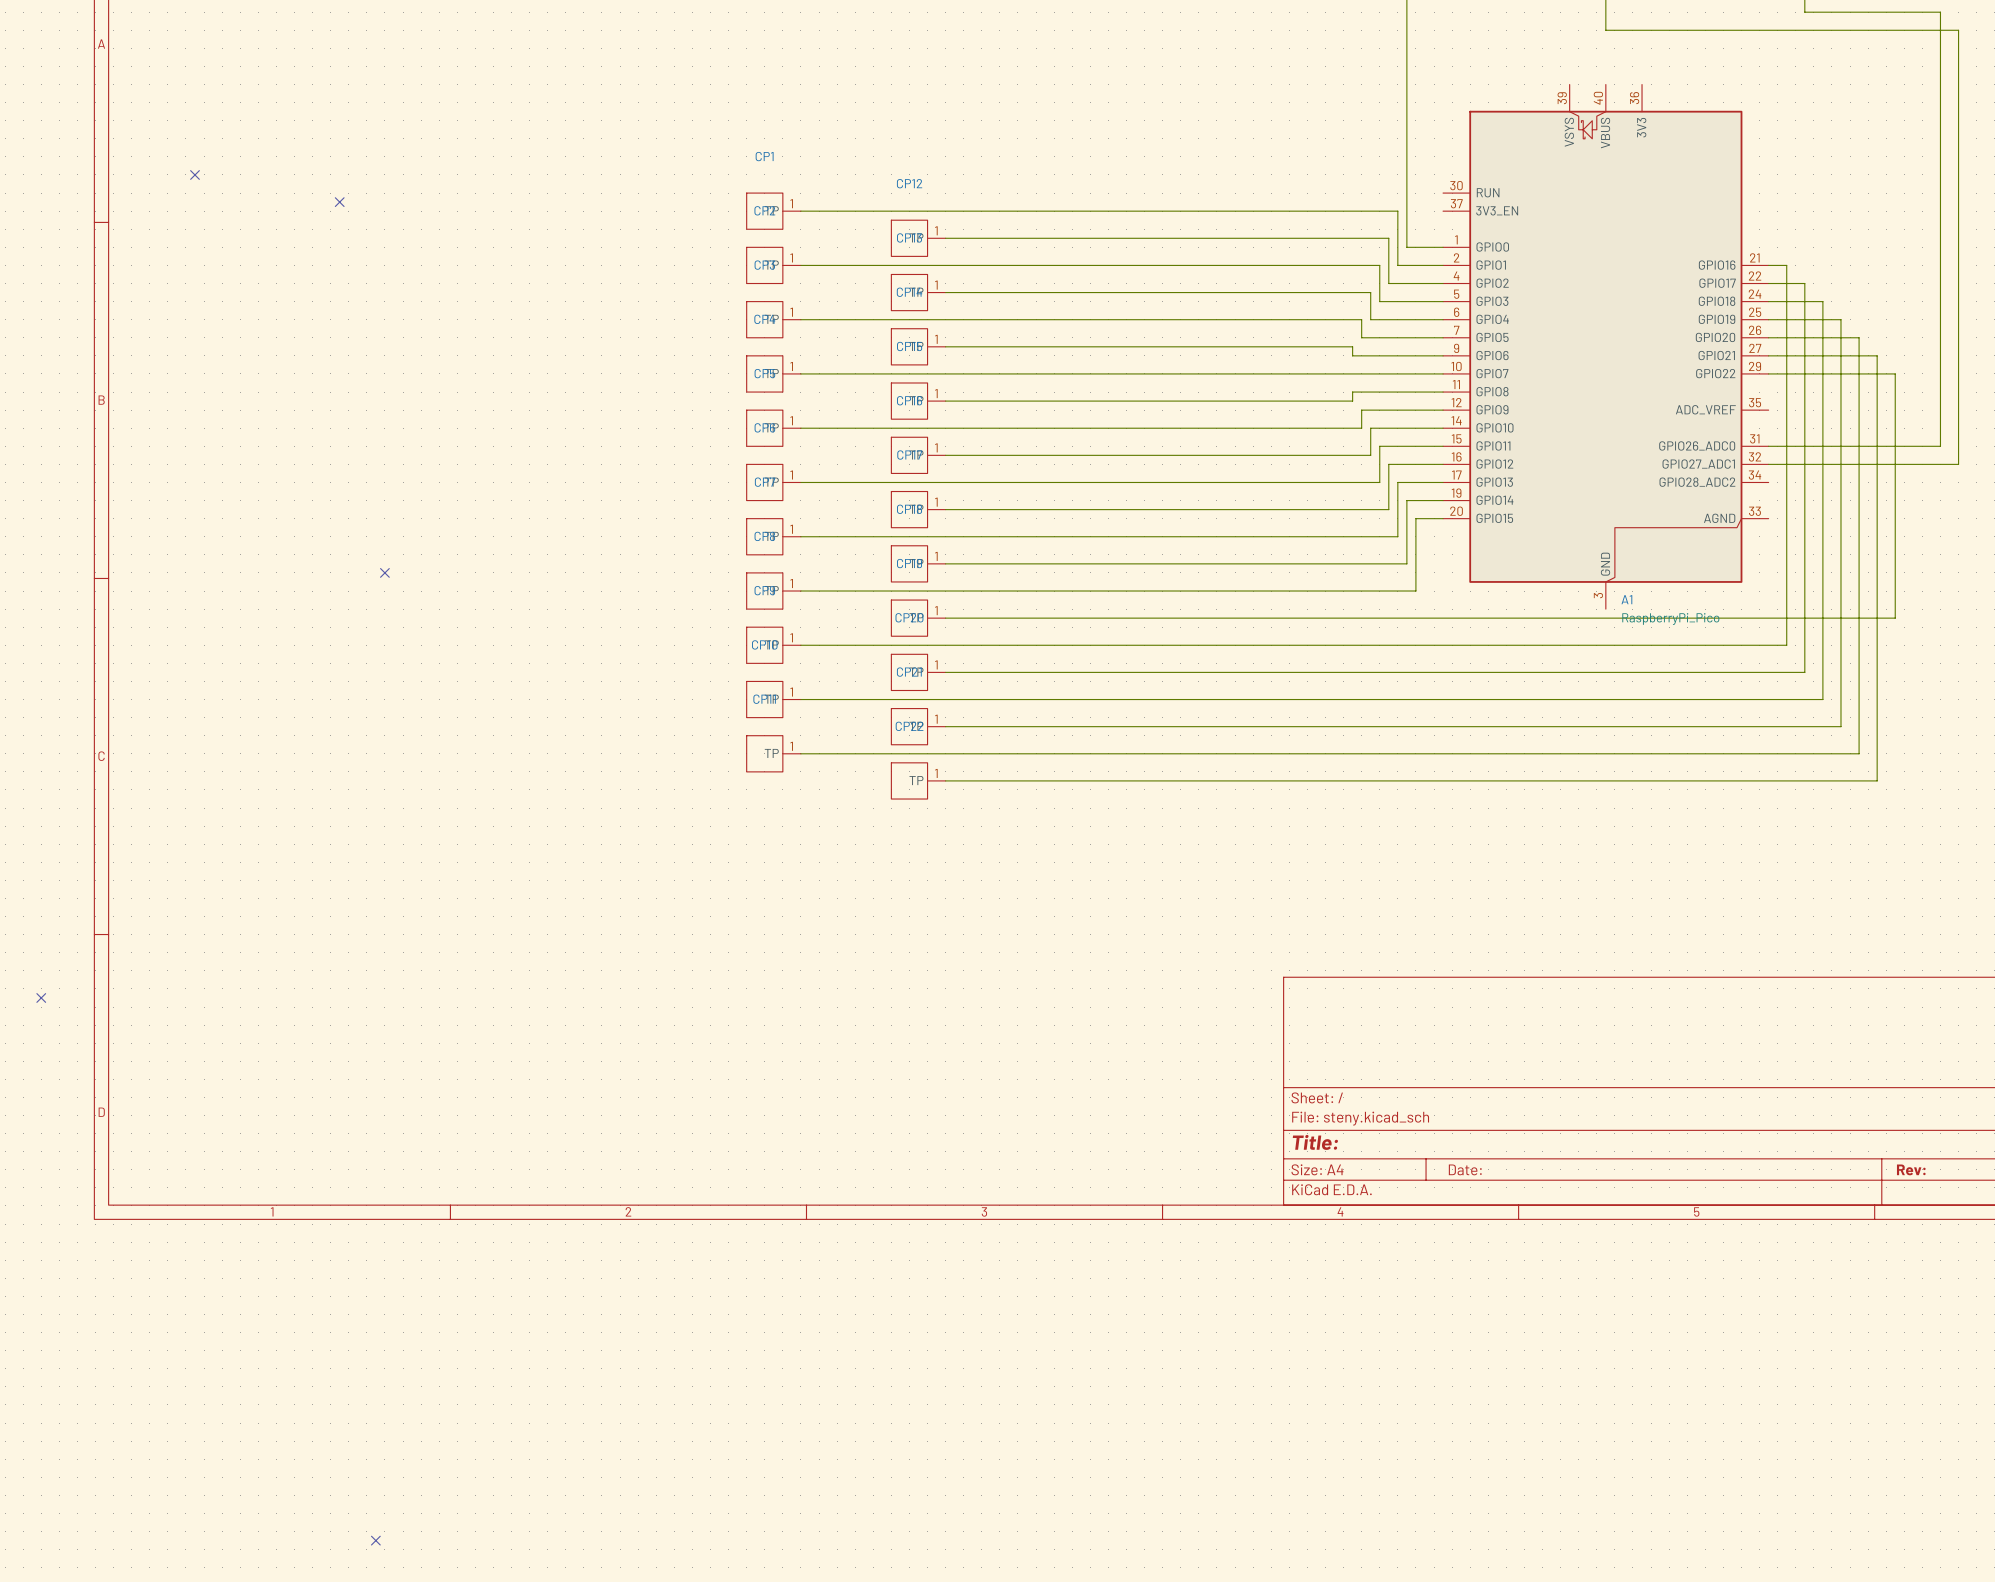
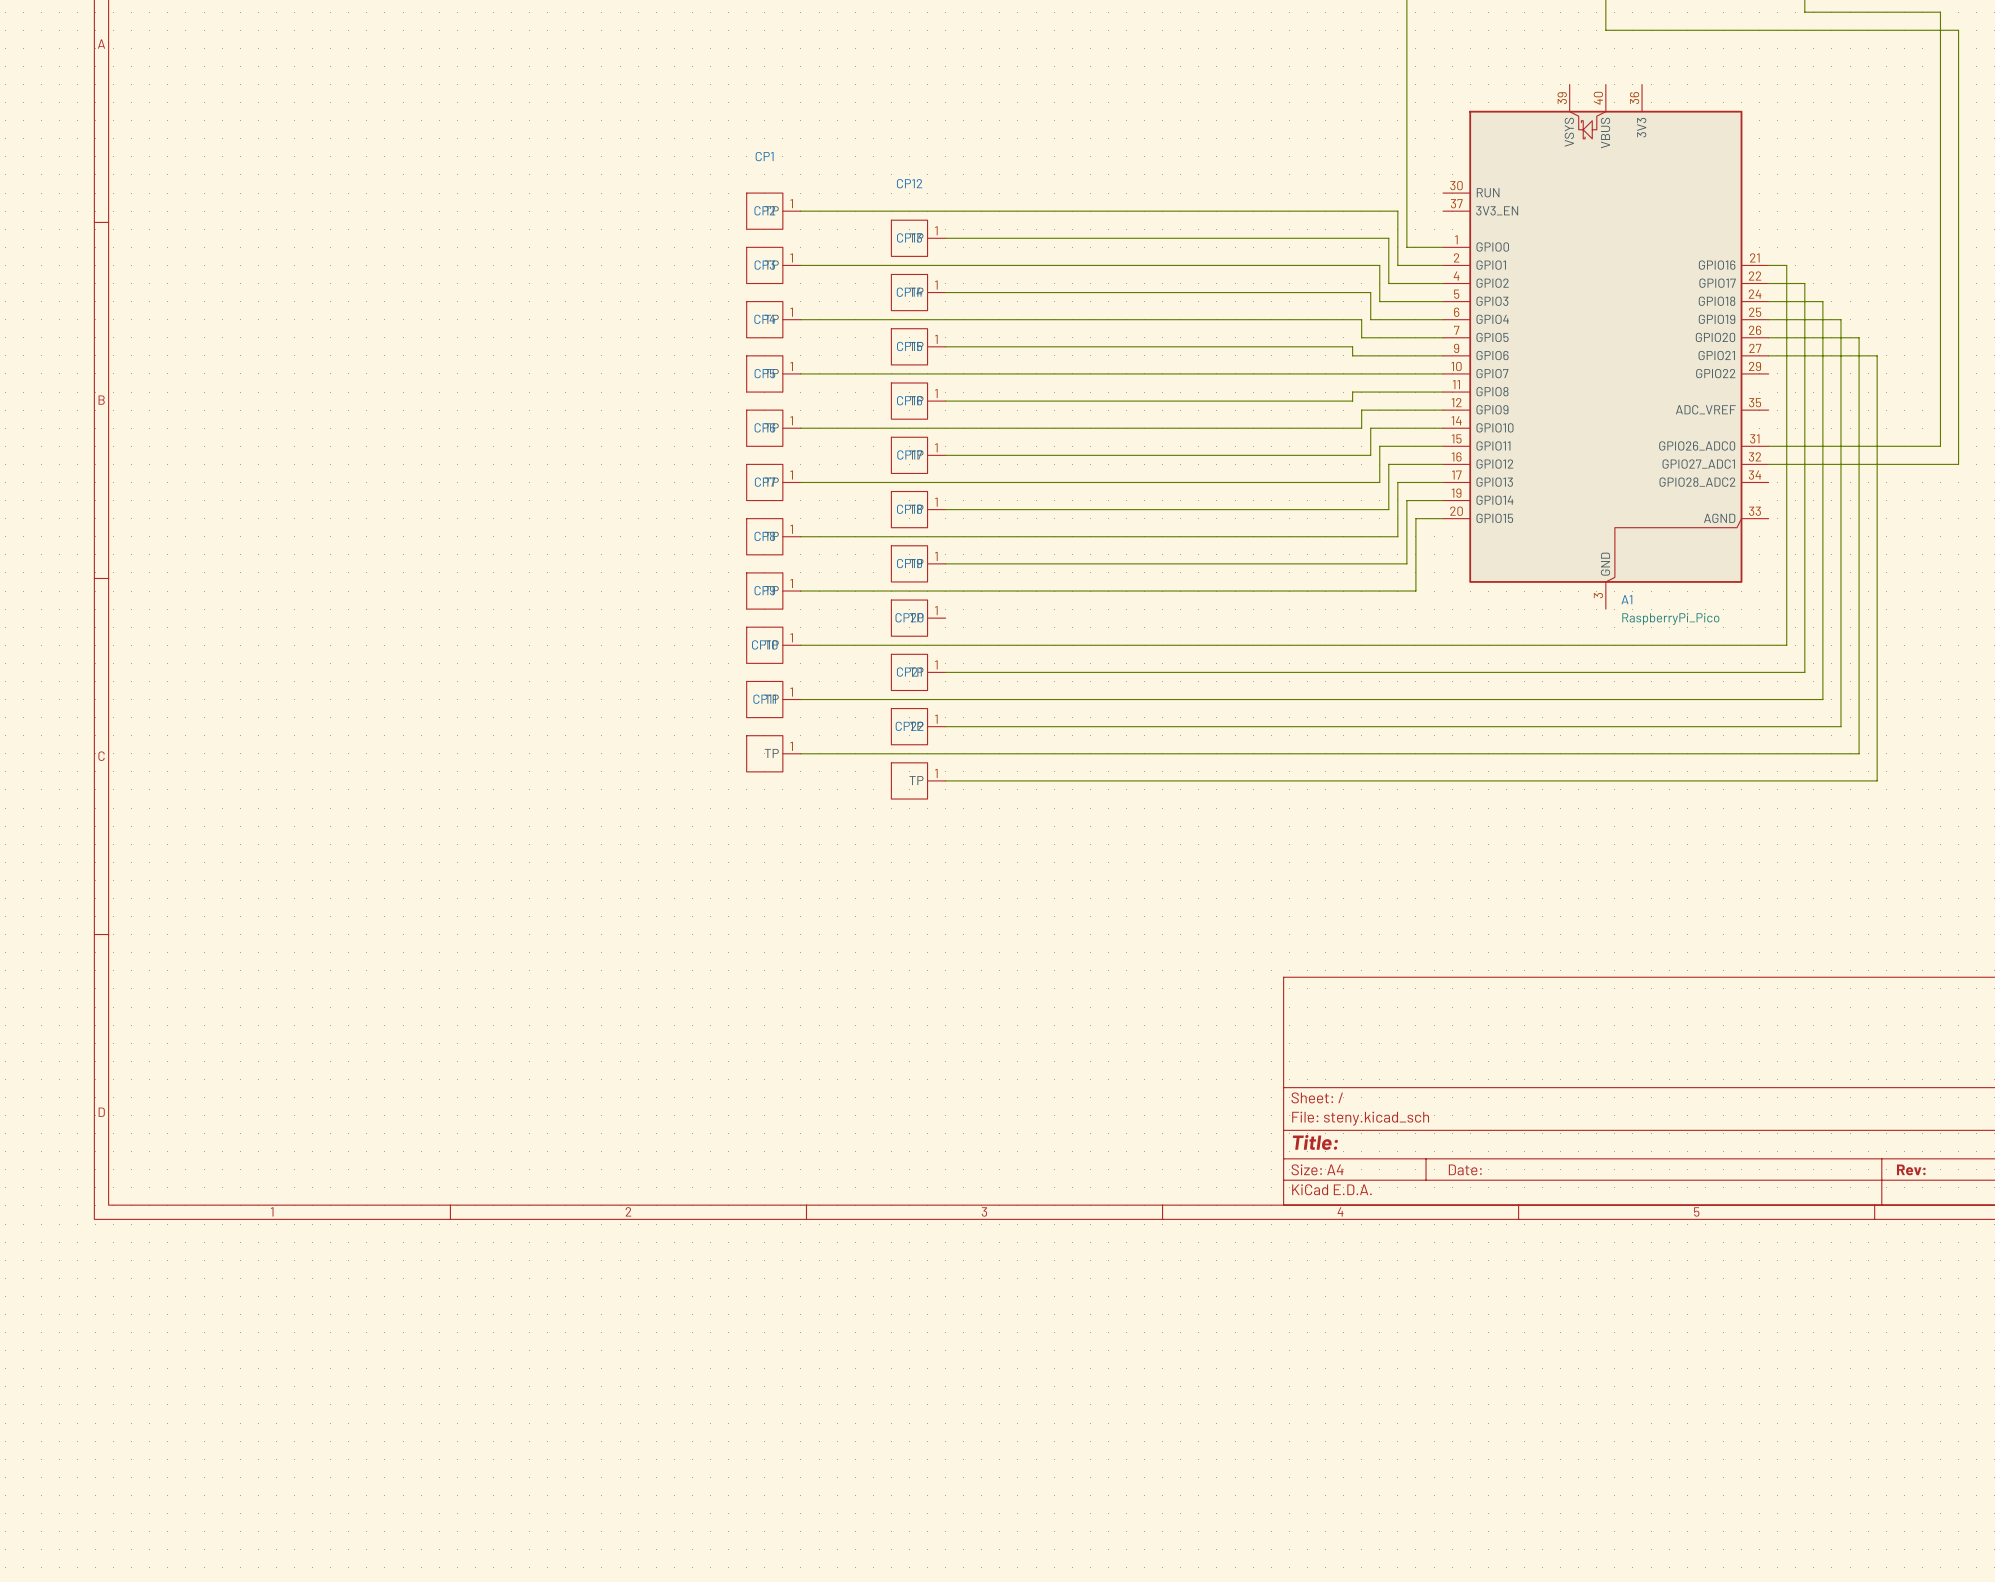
no-connect mark: (195, 174) -> none
no-connect mark: (339, 202) -> none
wire: (1768, 373) (1895, 373) (1895, 618) (945, 618) -> none
no-connect mark: (384, 572) -> none
no-connect mark: (41, 997) -> none
no-connect mark: (375, 1540) -> none

